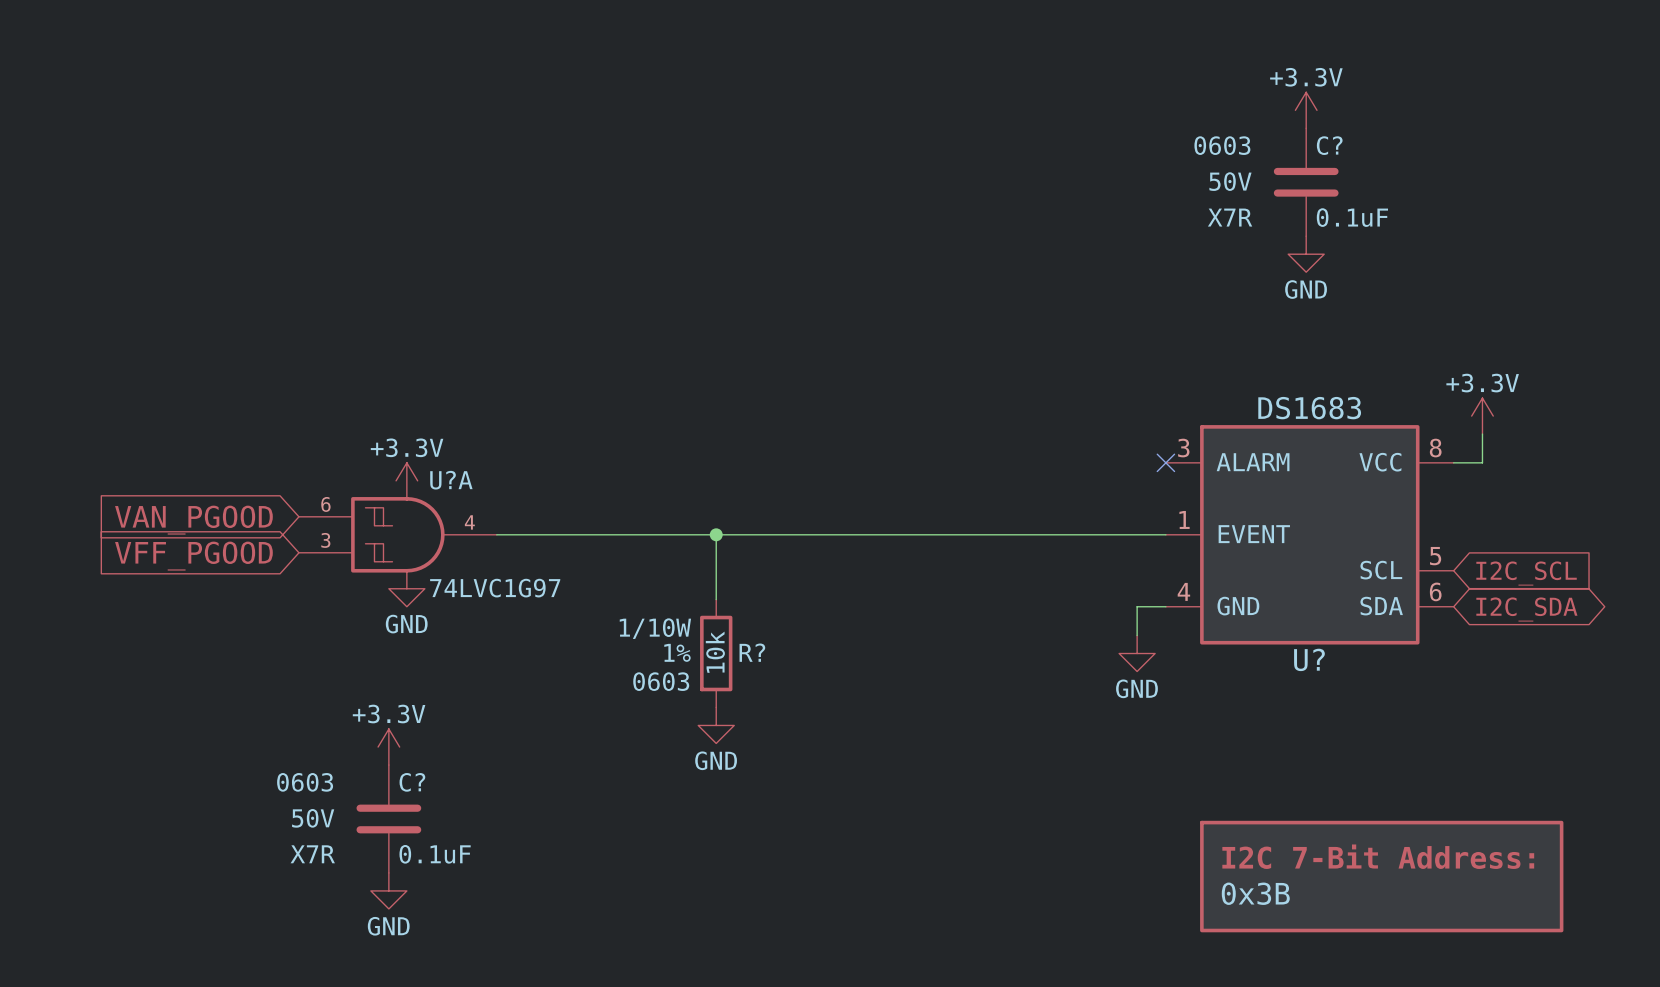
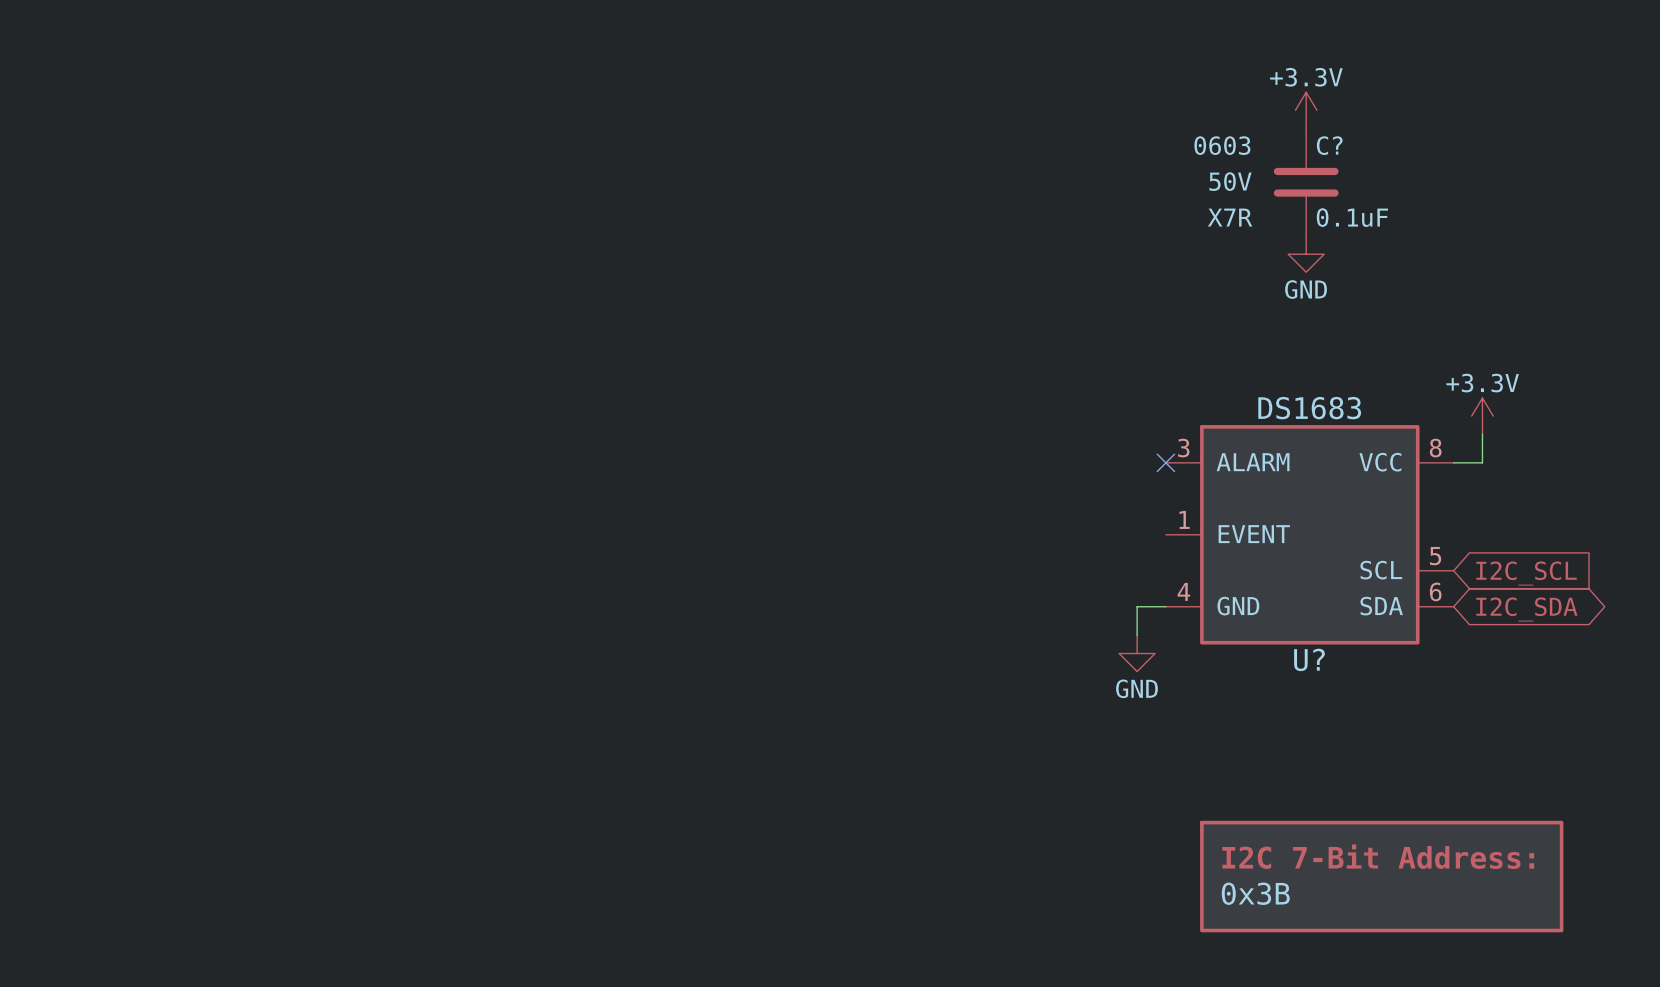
power symbol: +3.3V (406, 480) -> none
global label: VAN_PGOOD (193, 520) -> none
U?A: 74LVC1G97 (397, 534) -> none
wire: (496, 534) (1165, 534) -> none
wire: (716, 534) (716, 599) -> none
junction: (716, 534) -> none
global label: VFF_PGOOD (193, 556) -> none
power symbol: GND (406, 588) -> none
R?: 10k (716, 653) -> none
power symbol: GND (716, 725) -> none
power symbol: +3.3V (388, 747) -> none
C?: 0.1uF (388, 818) -> none
power symbol: GND (388, 890) -> none

